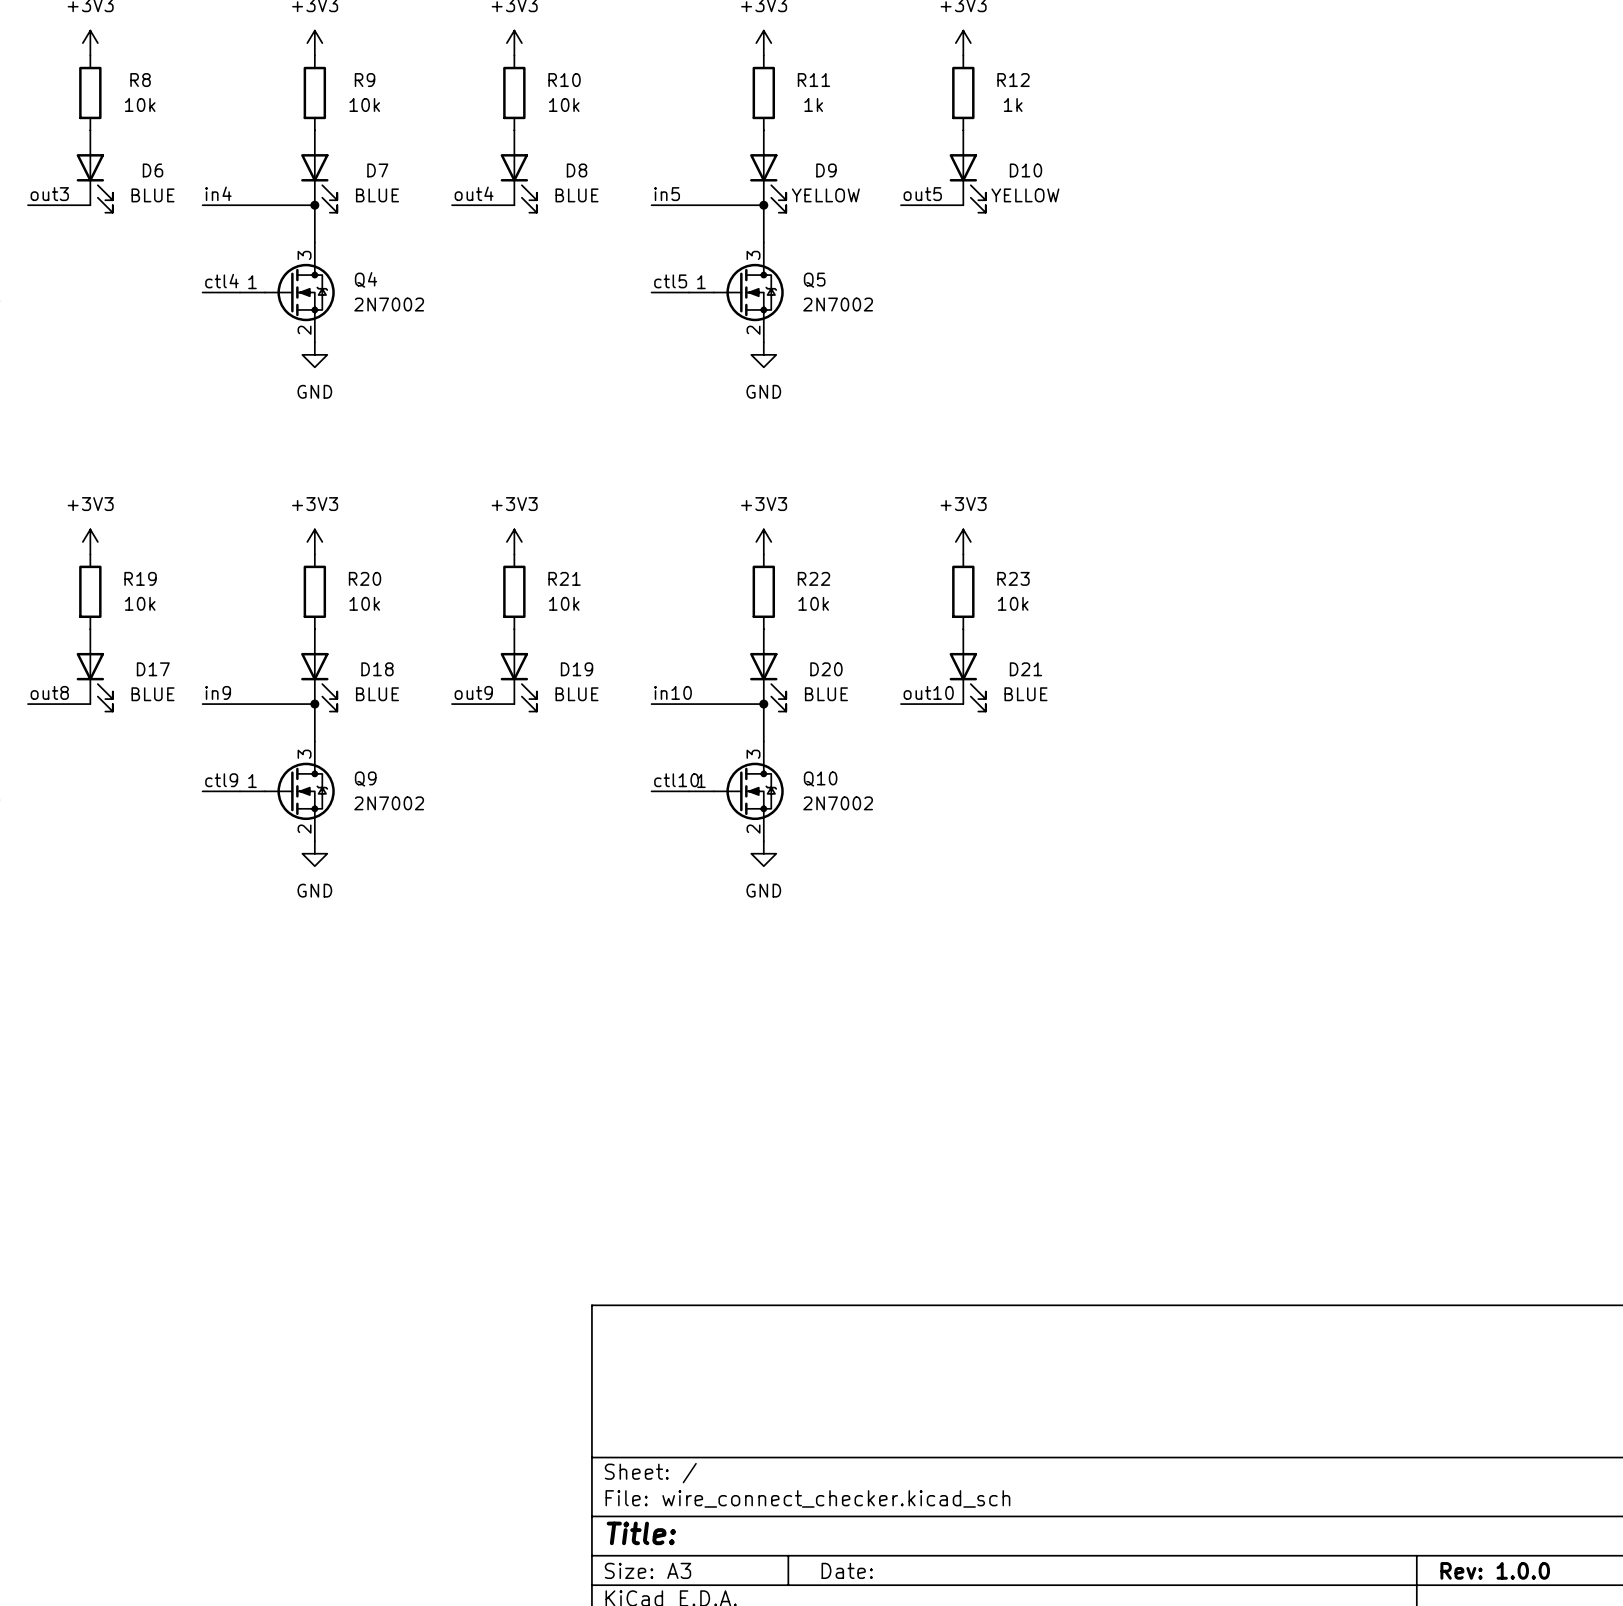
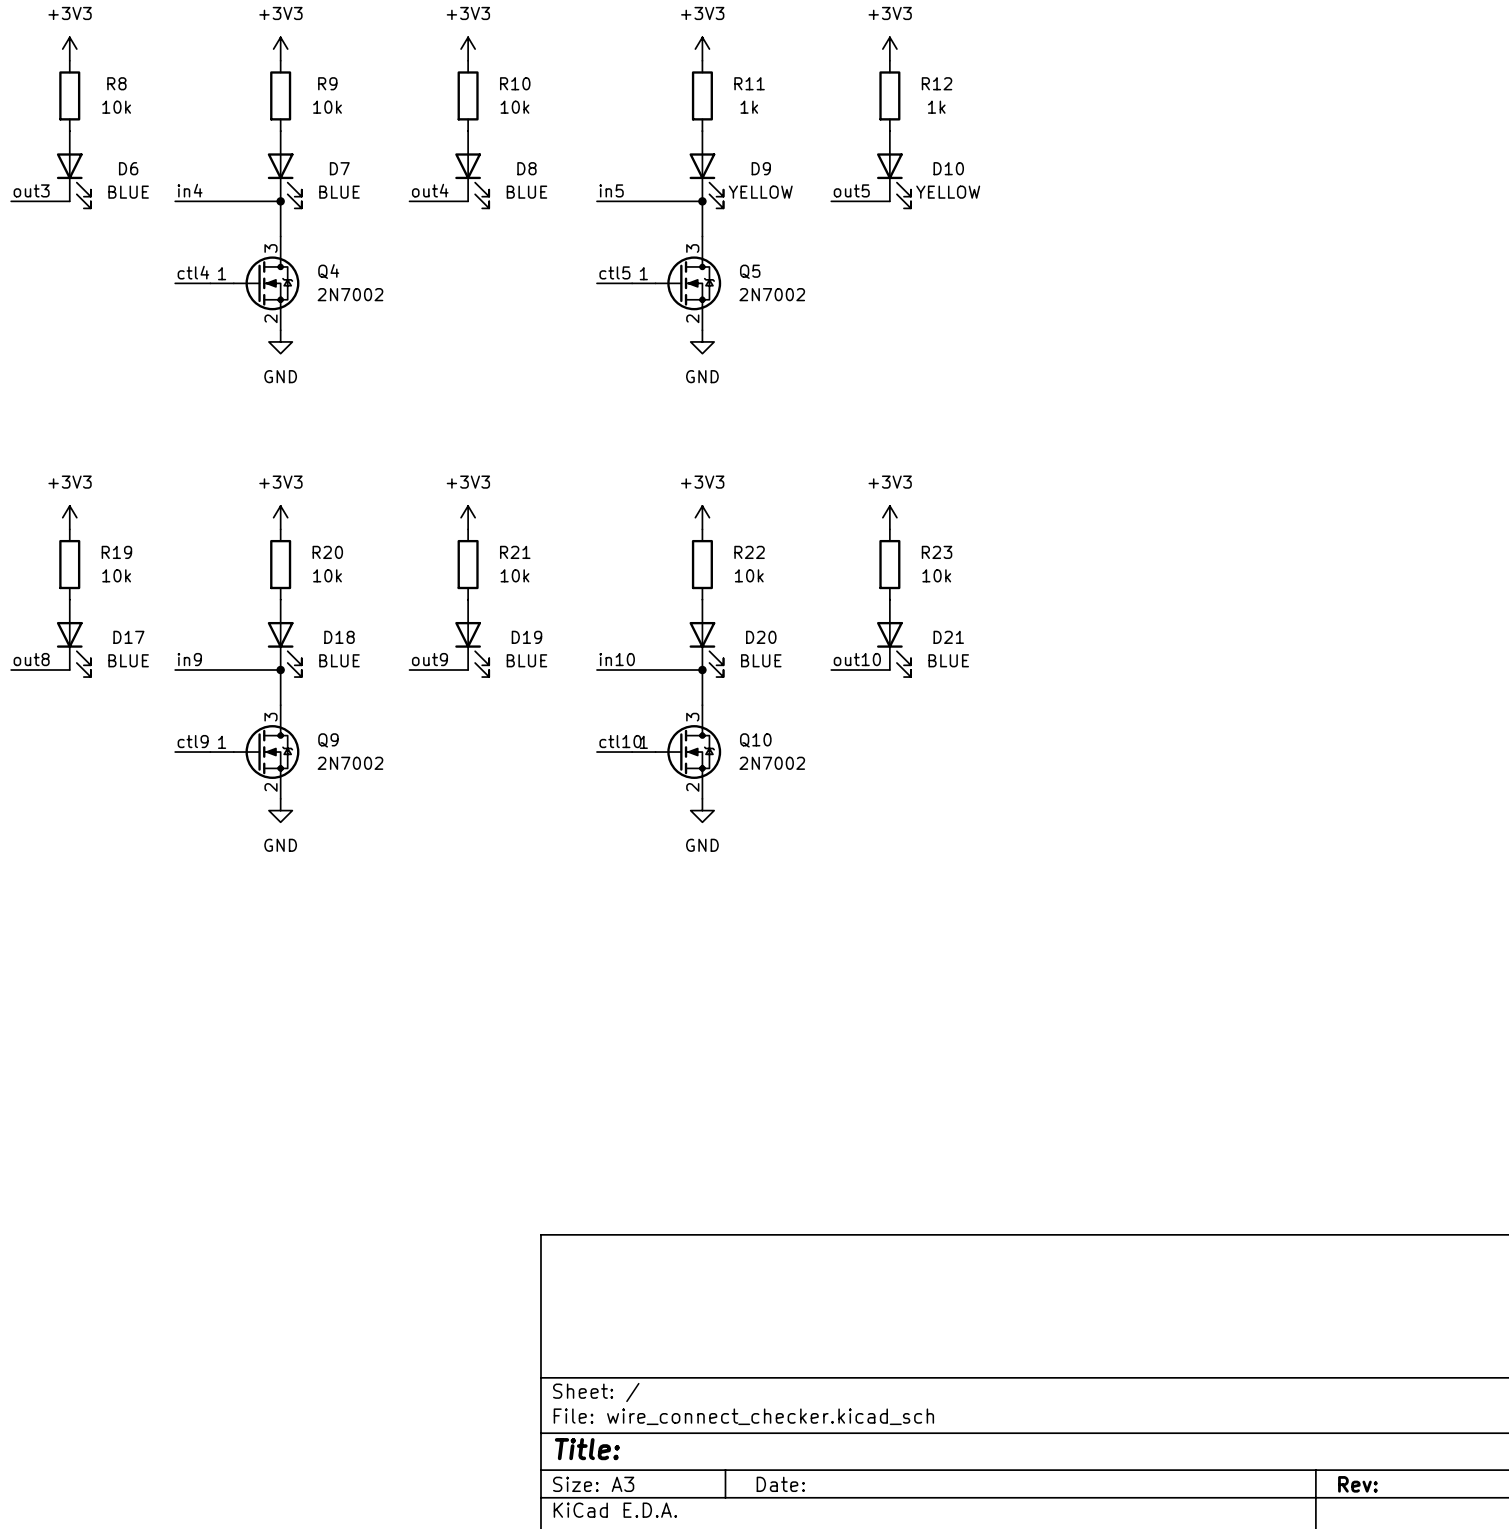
title block: Rev: 1.0.0 (1495, 1570) -> Rev: (1357, 1484)

